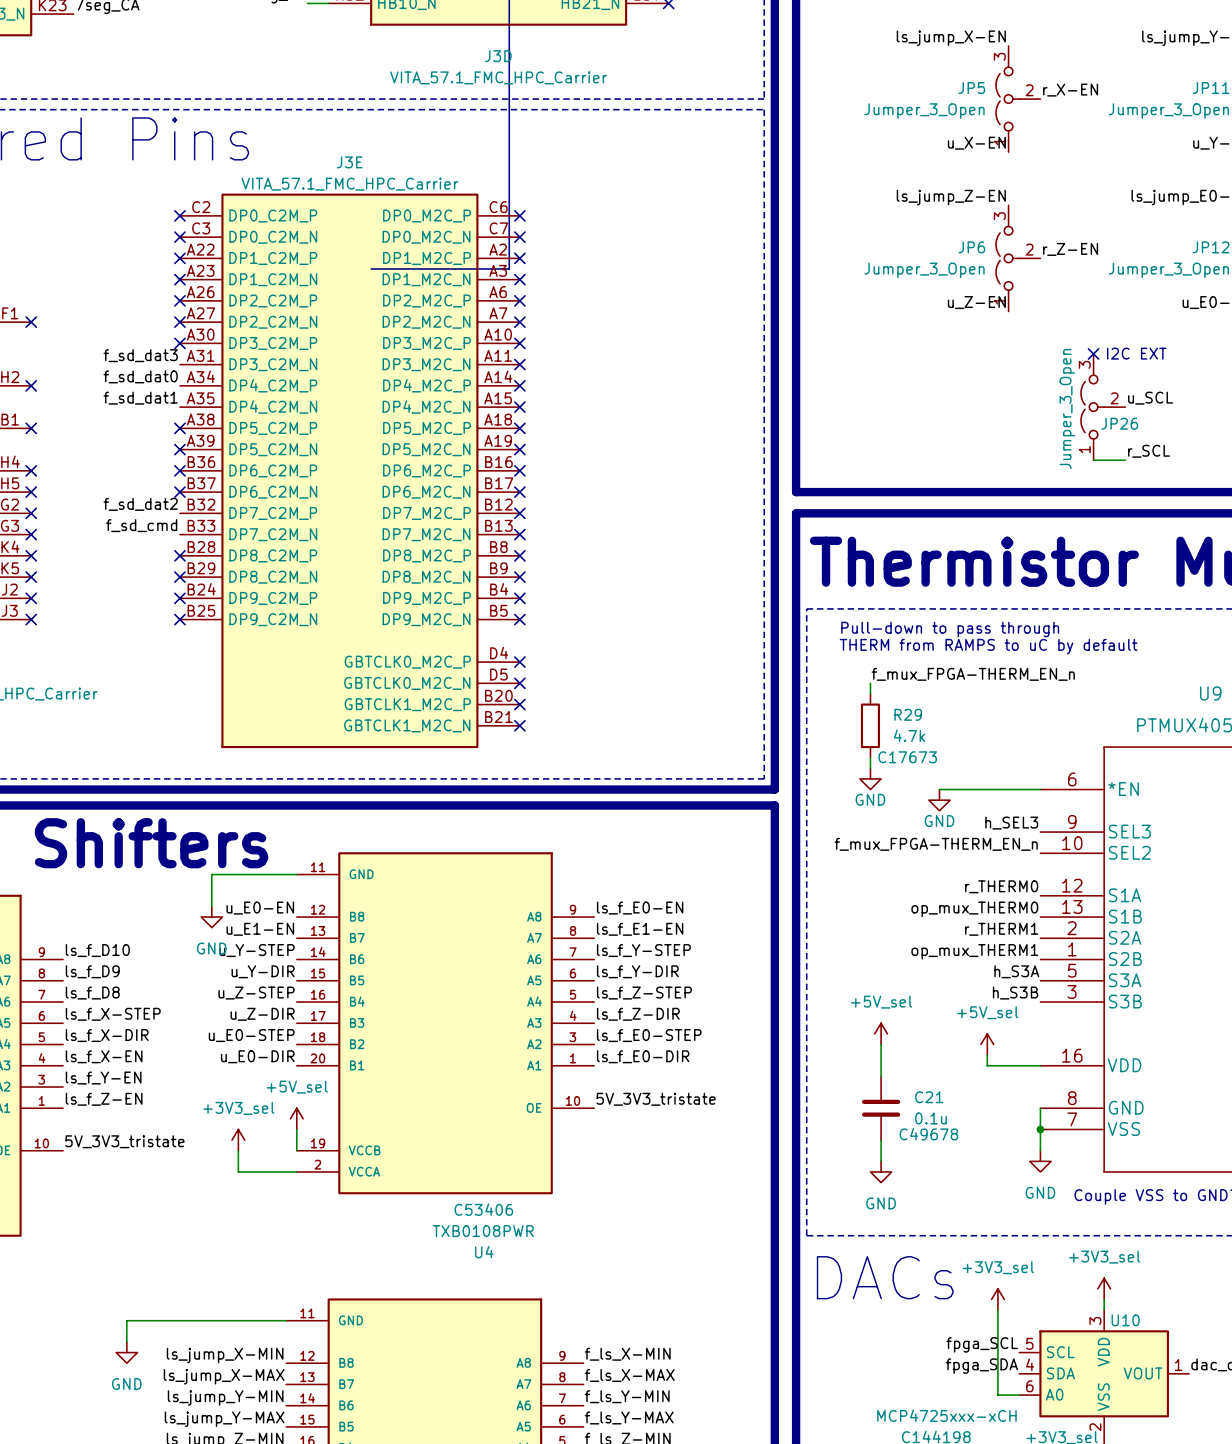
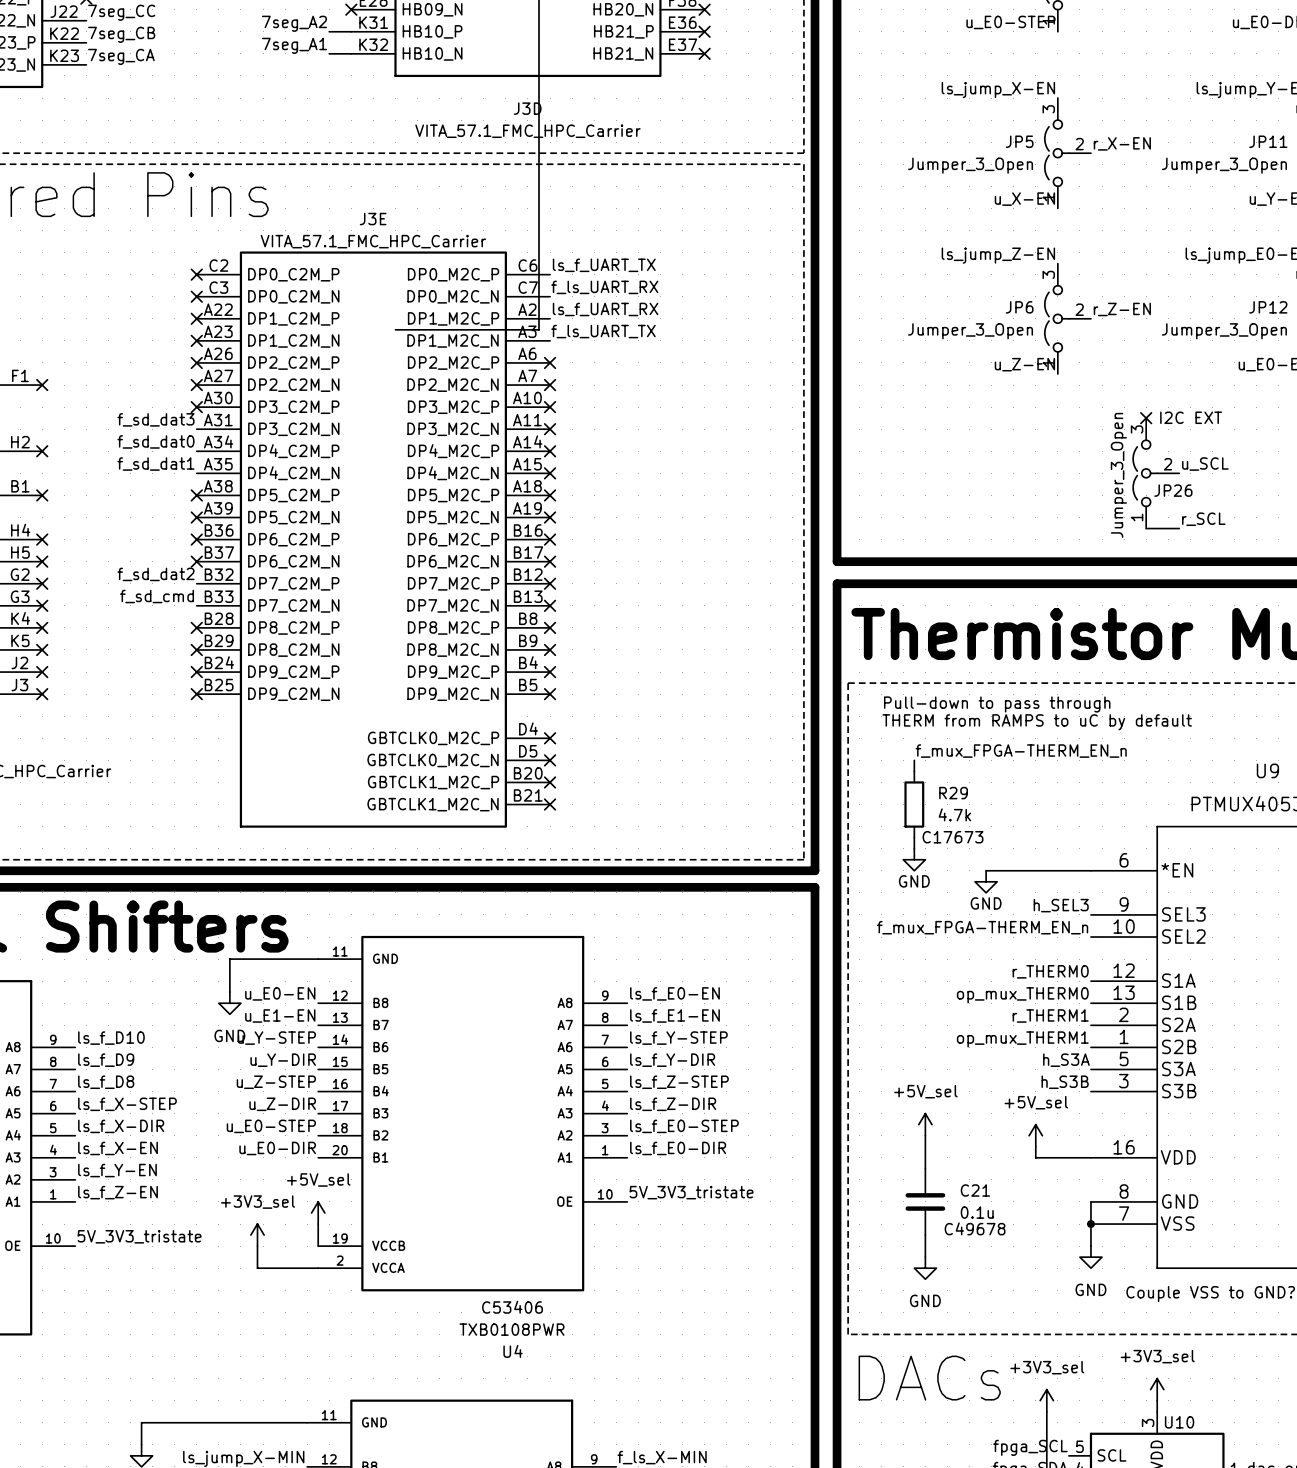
label: none -> ls_f_UART_TX (604, 265)
no-connect mark: (519, 215) -> none
label: none -> f_ls_UART_RX (604, 287)
no-connect mark: (519, 237) -> none
label: none -> ls_f_UART_RX (605, 309)
no-connect mark: (519, 258) -> none
label: none -> f_ls_UART_TX (603, 331)
no-connect mark: (519, 279) -> none

